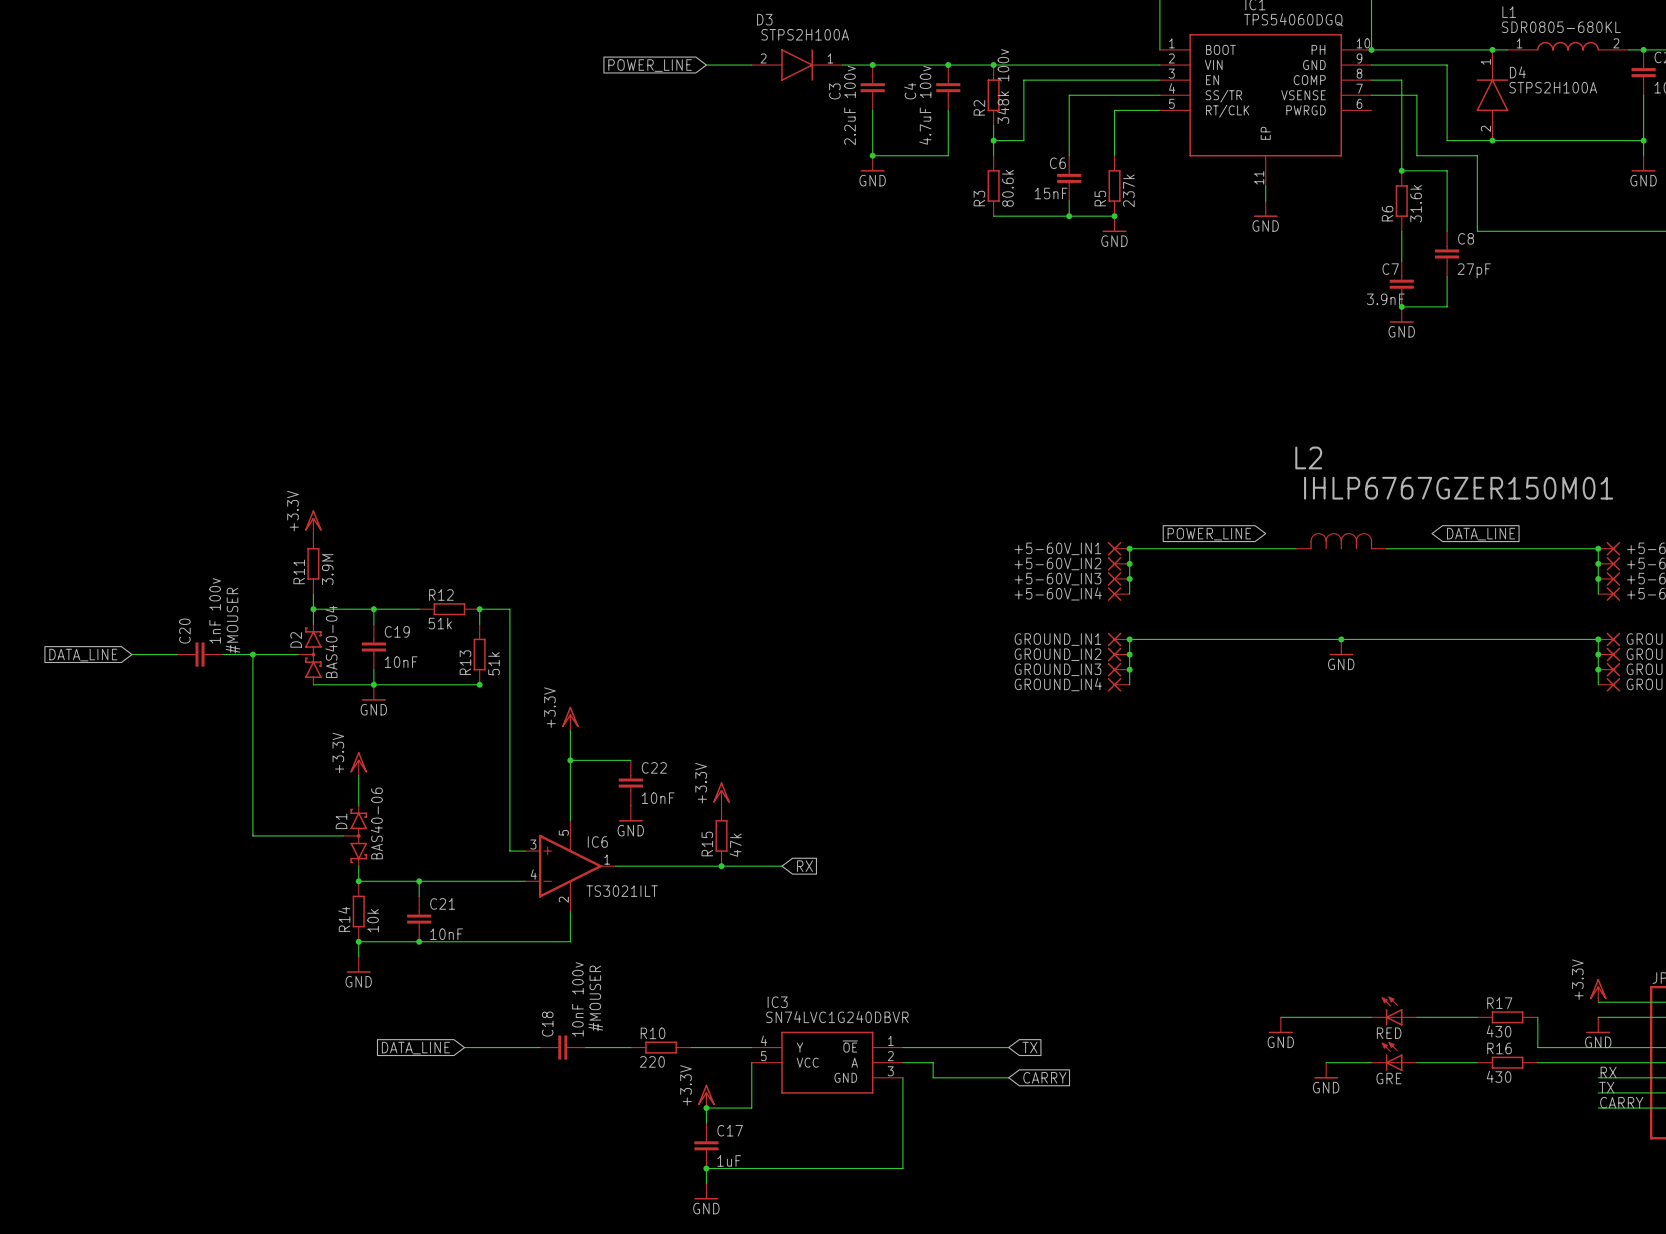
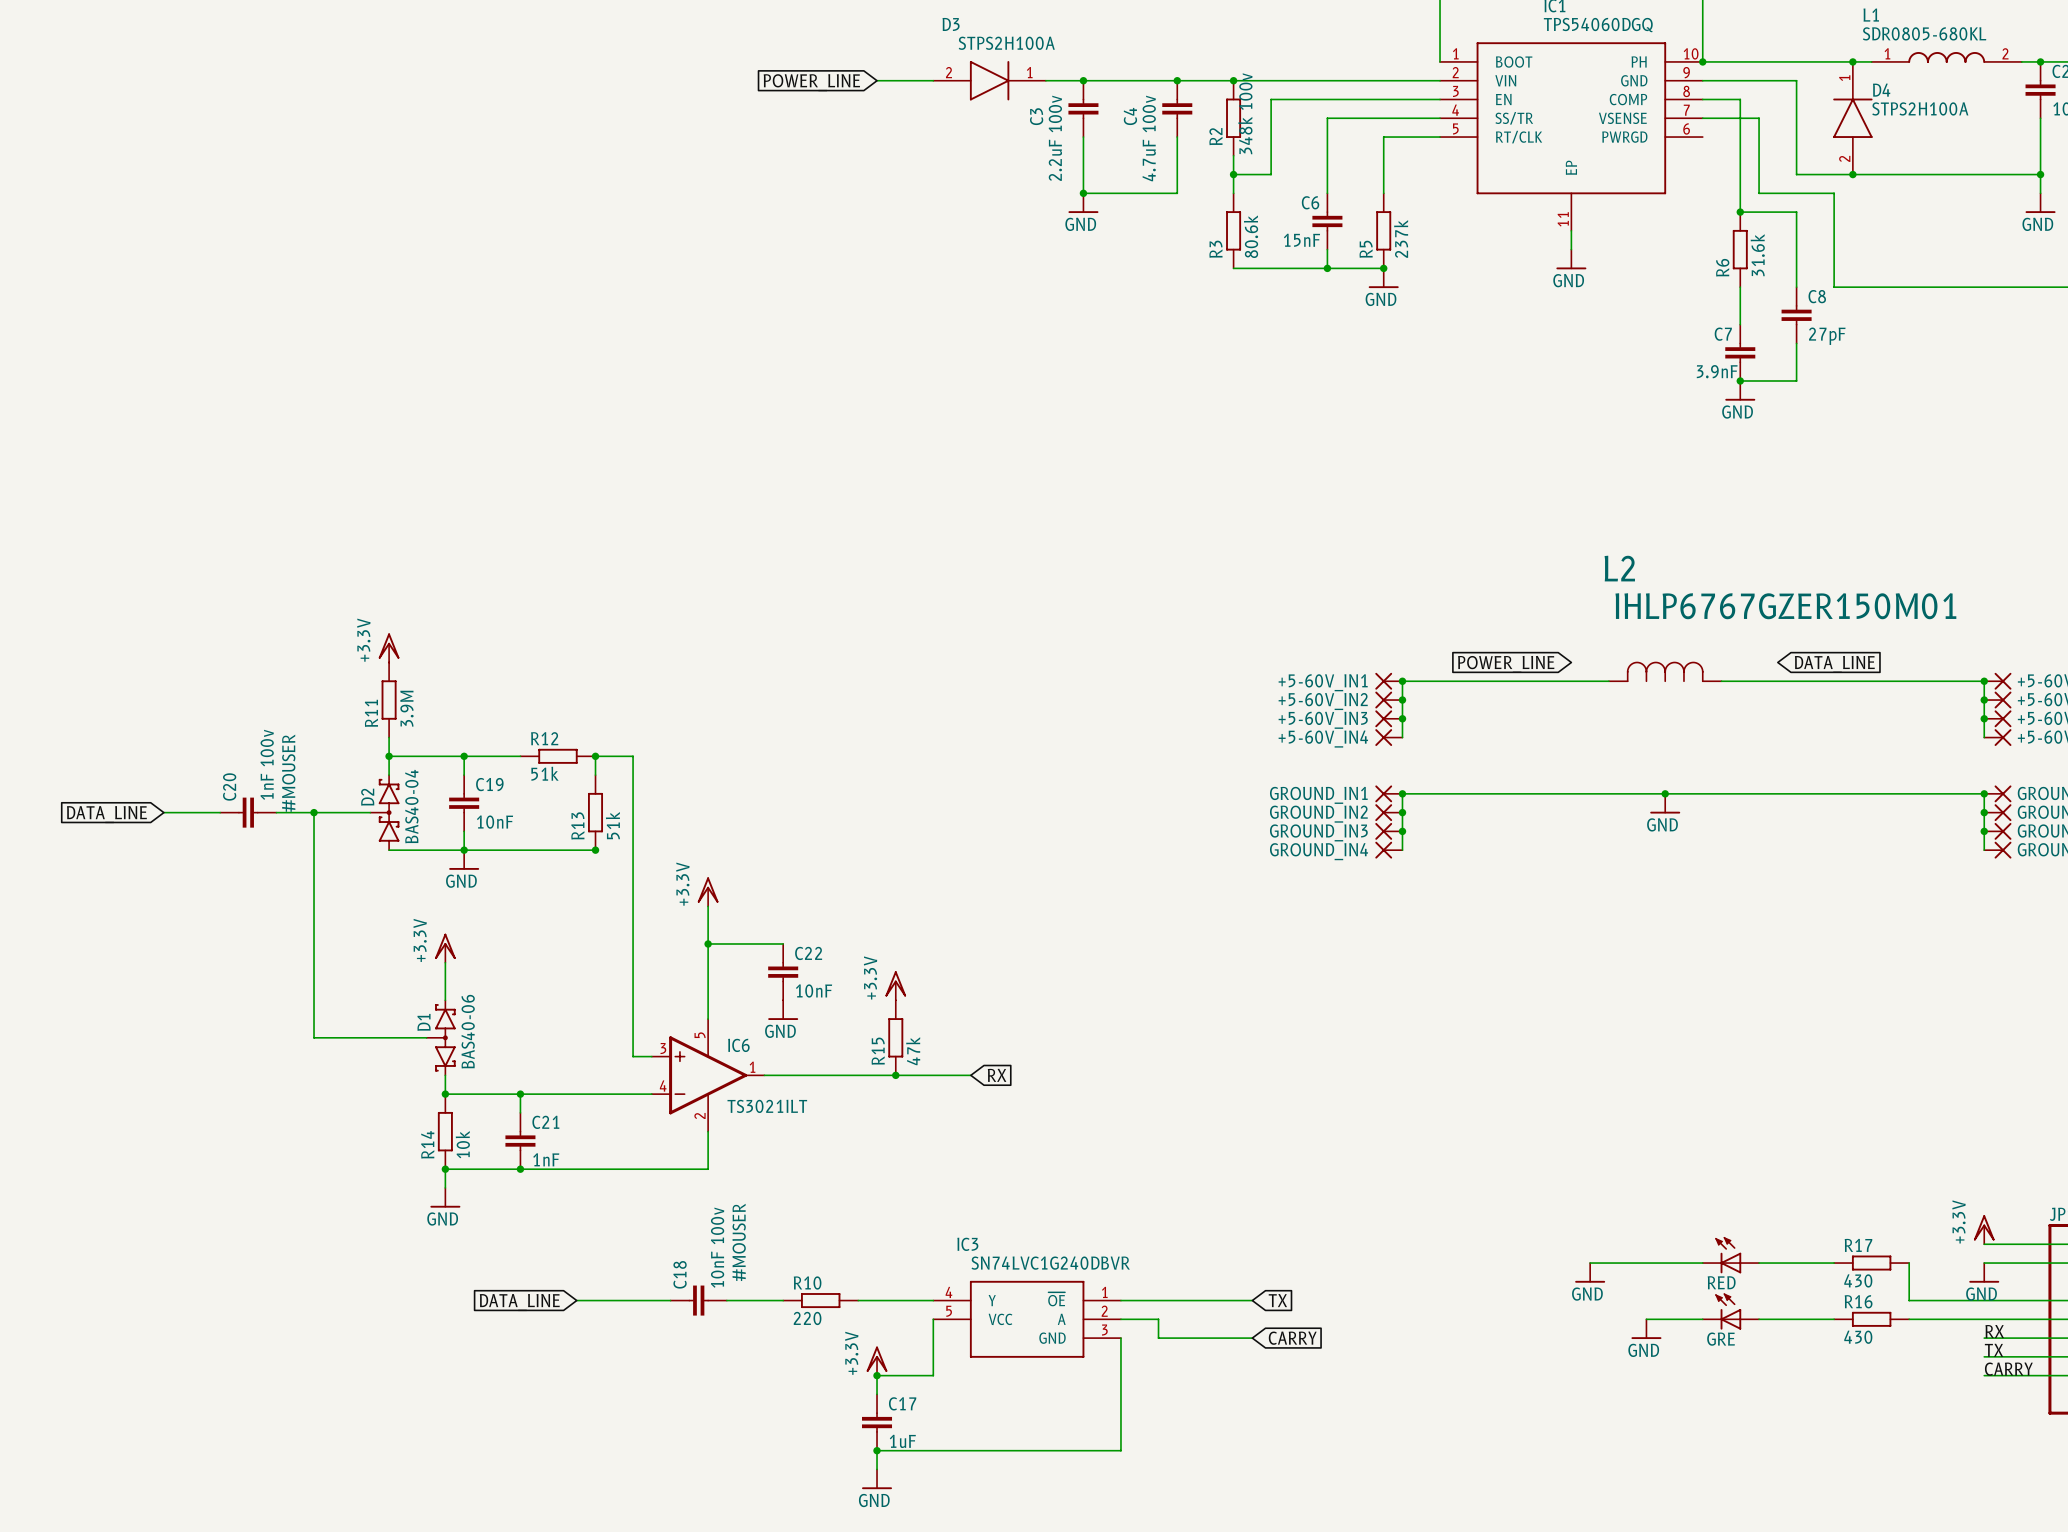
C21 value: 10nF (446, 934) -> 1nF (546, 1159)

